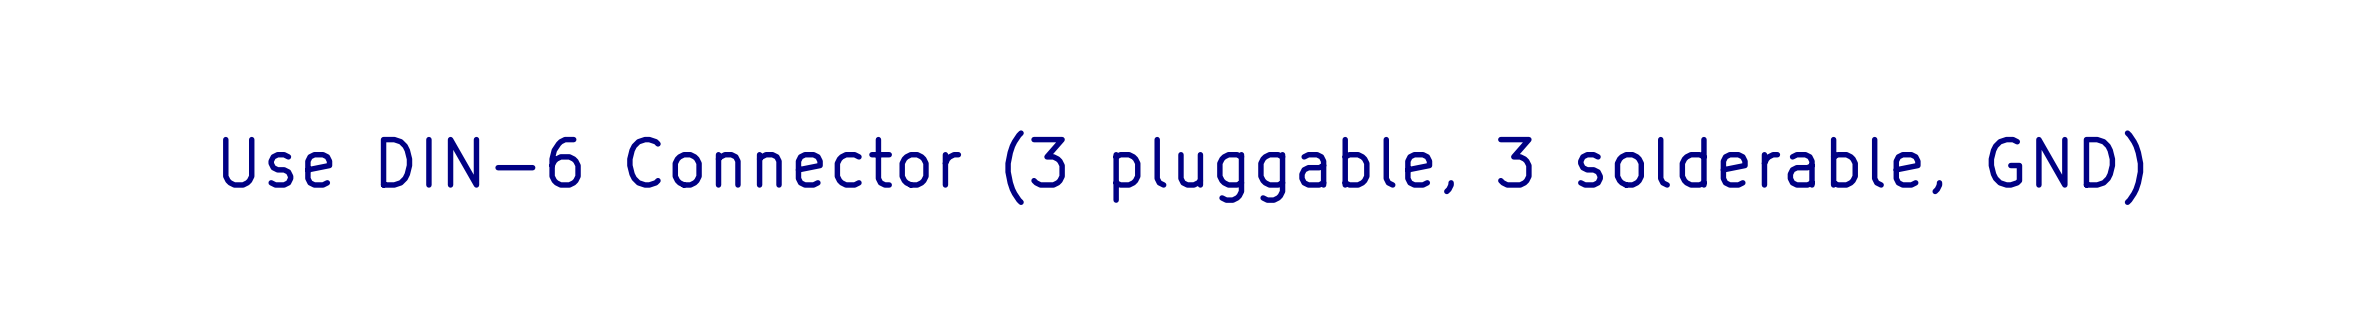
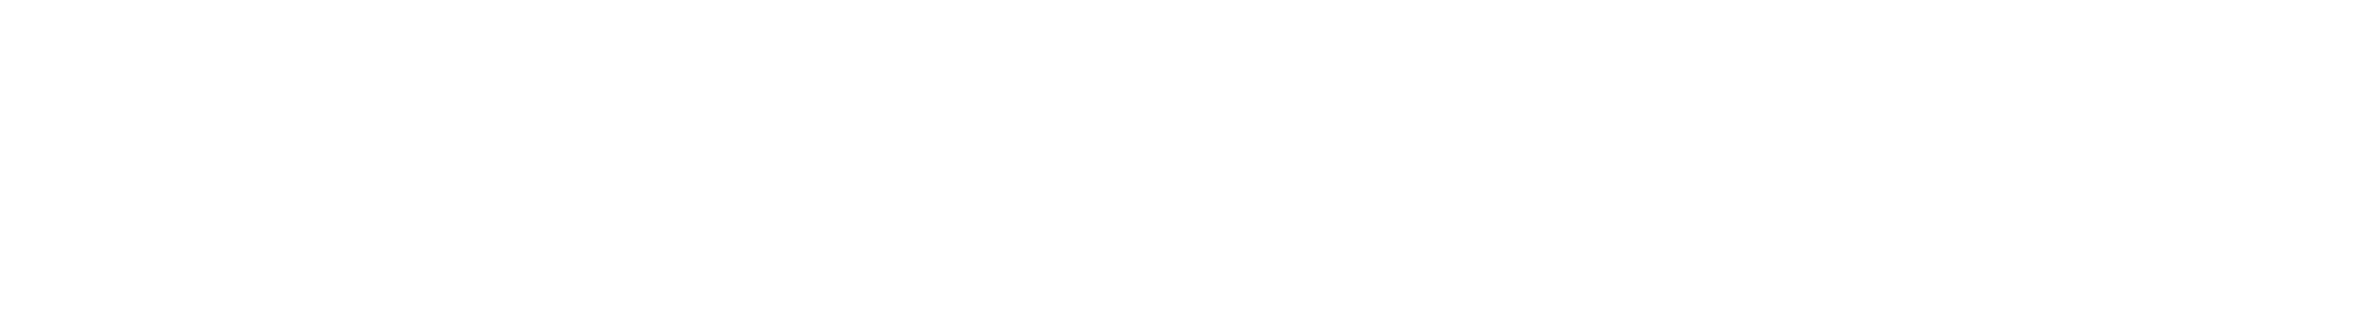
text: Use DIN-6 Connector (3 pluggable, 3 solderable, GND) (1183, 167) -> none

